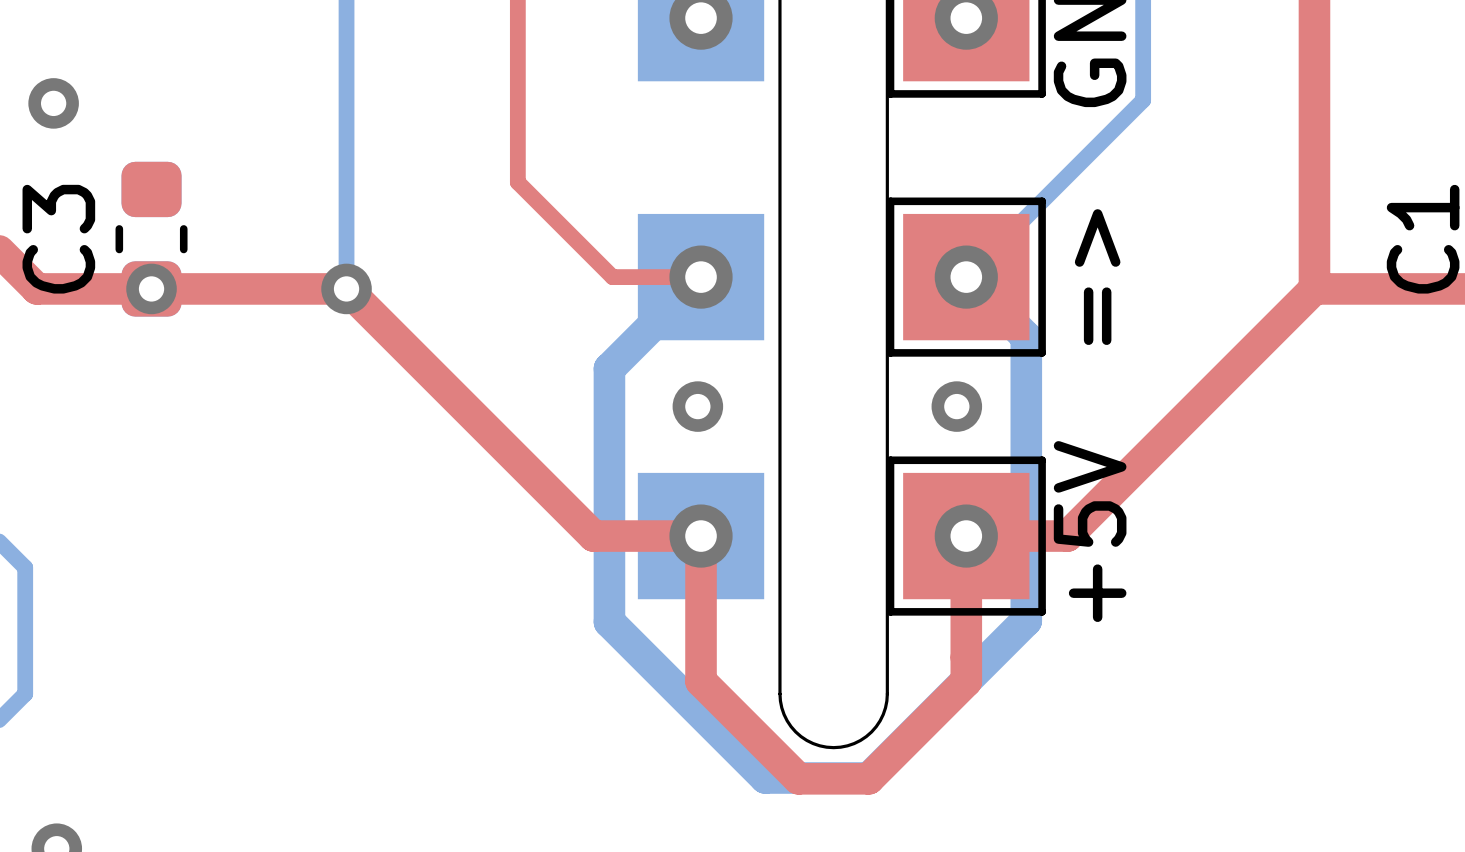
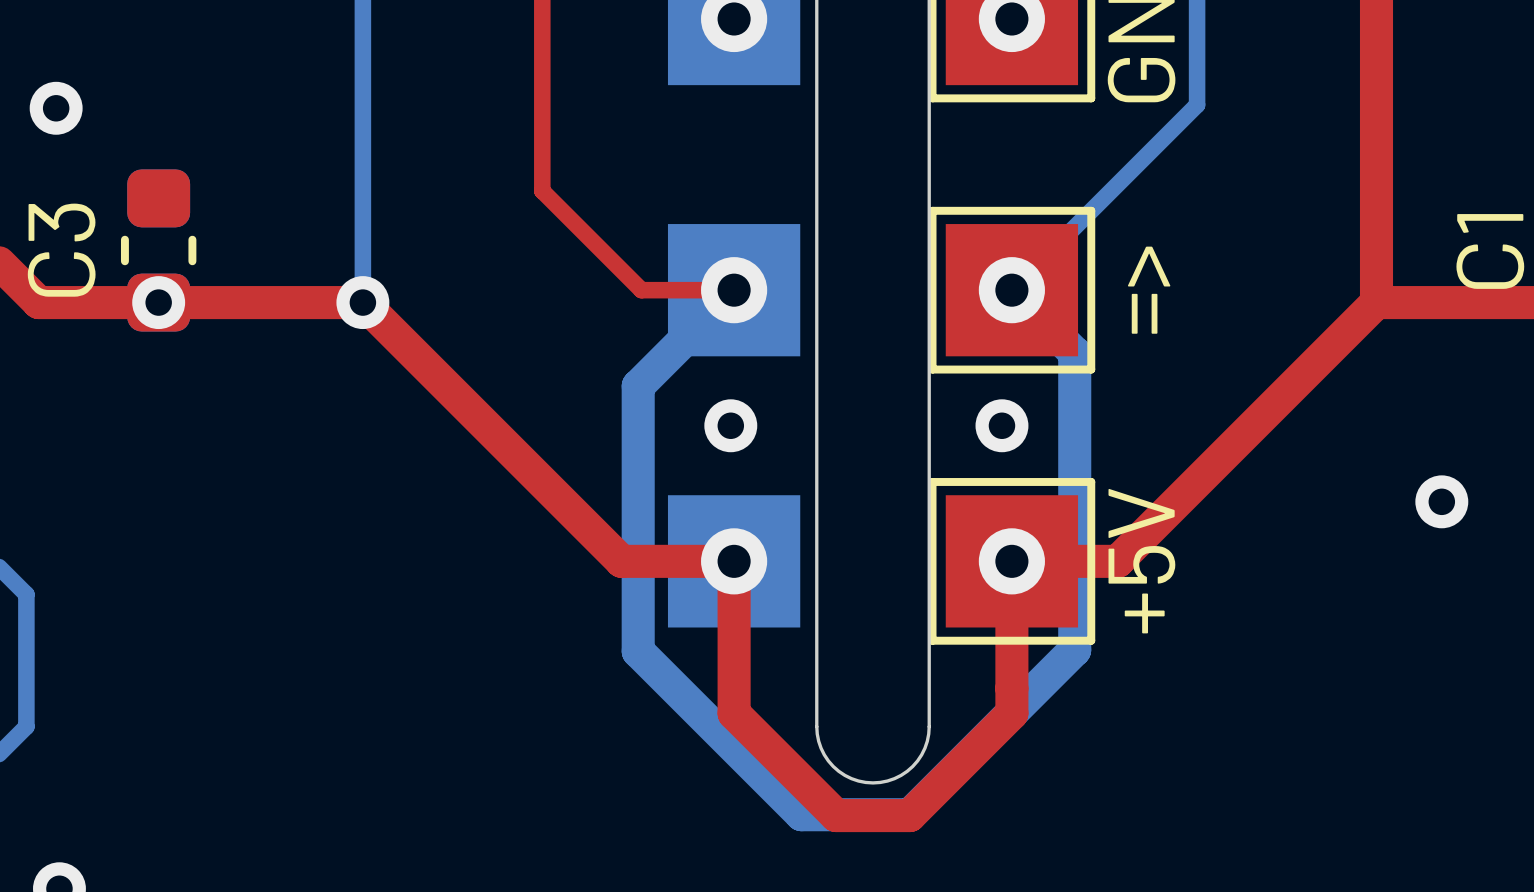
via: none -> (1441, 501)

